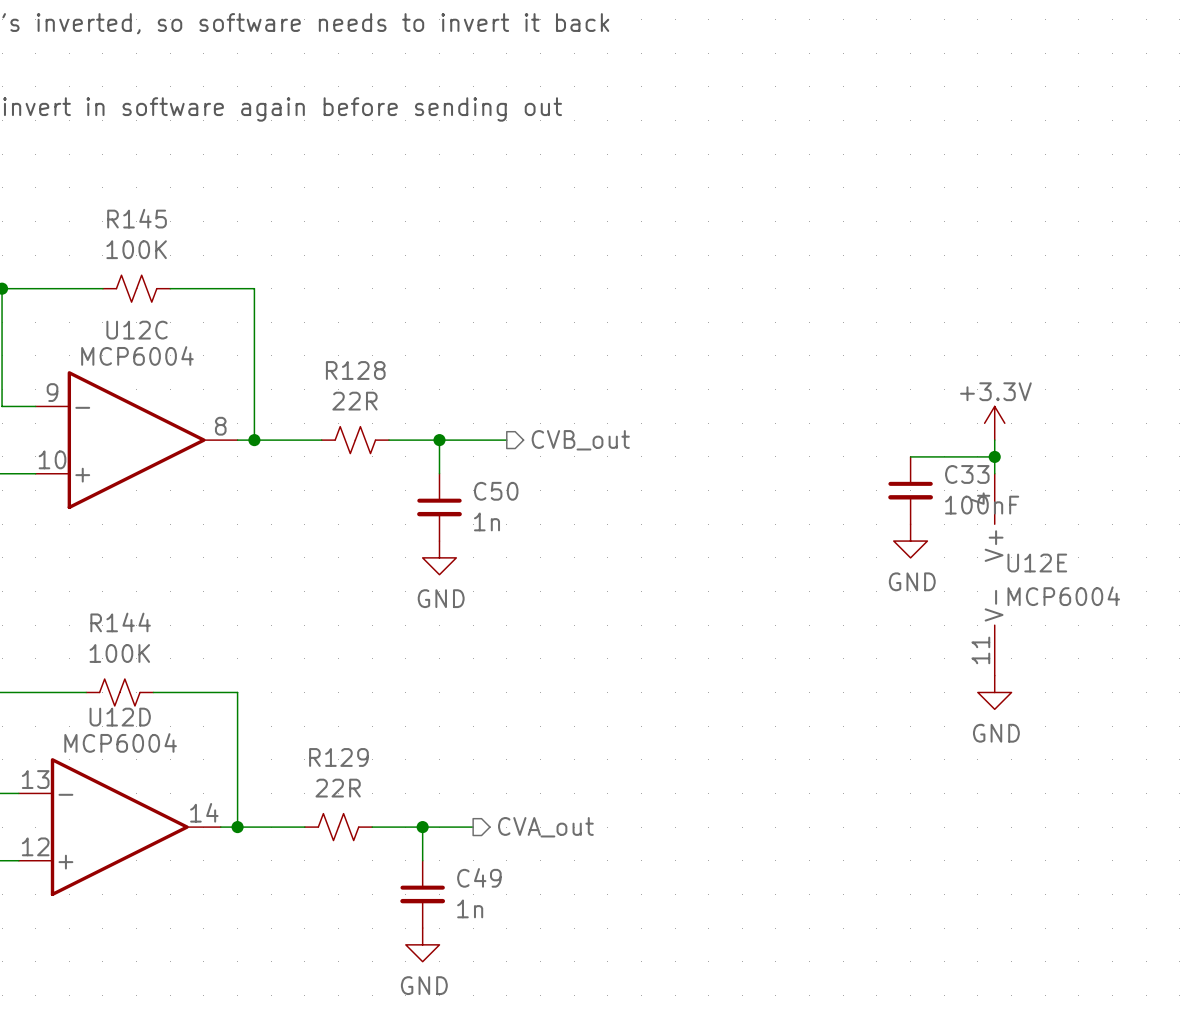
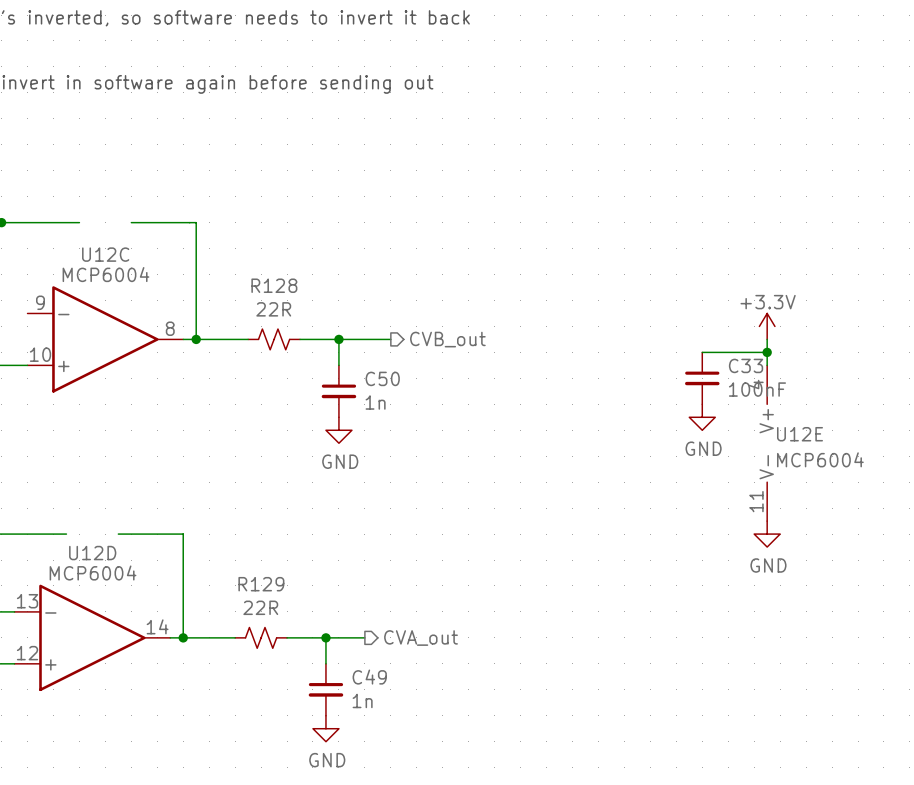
wire: (2, 288) (2, 406) (35, 406) -> none
R145: 100K (136, 288) -> none
R144: 100K (119, 692) -> none

